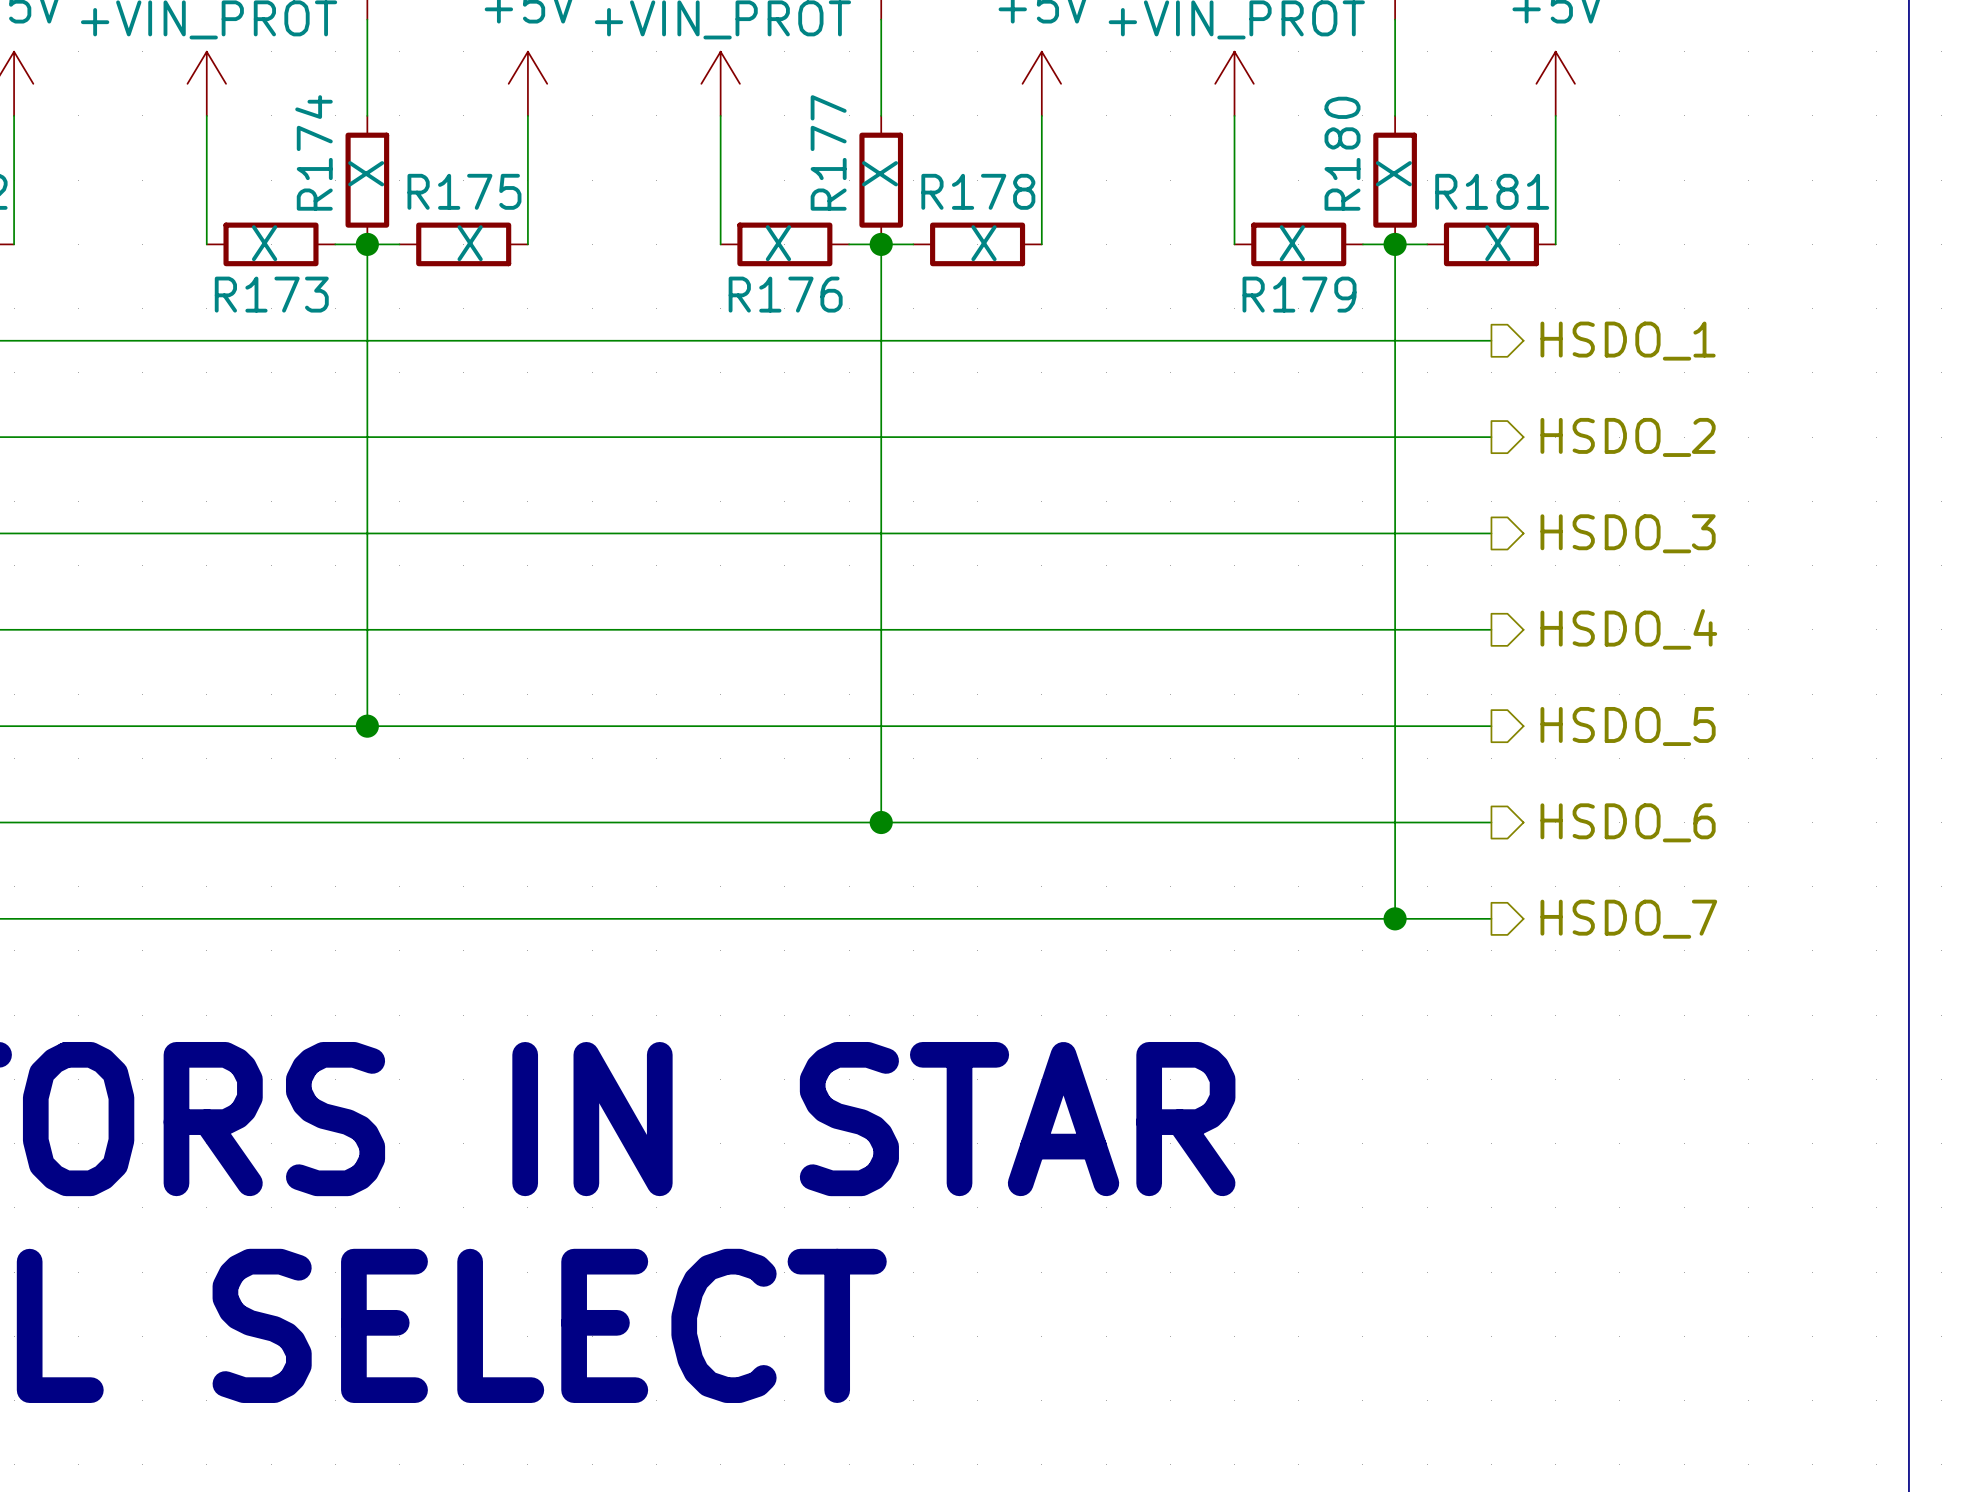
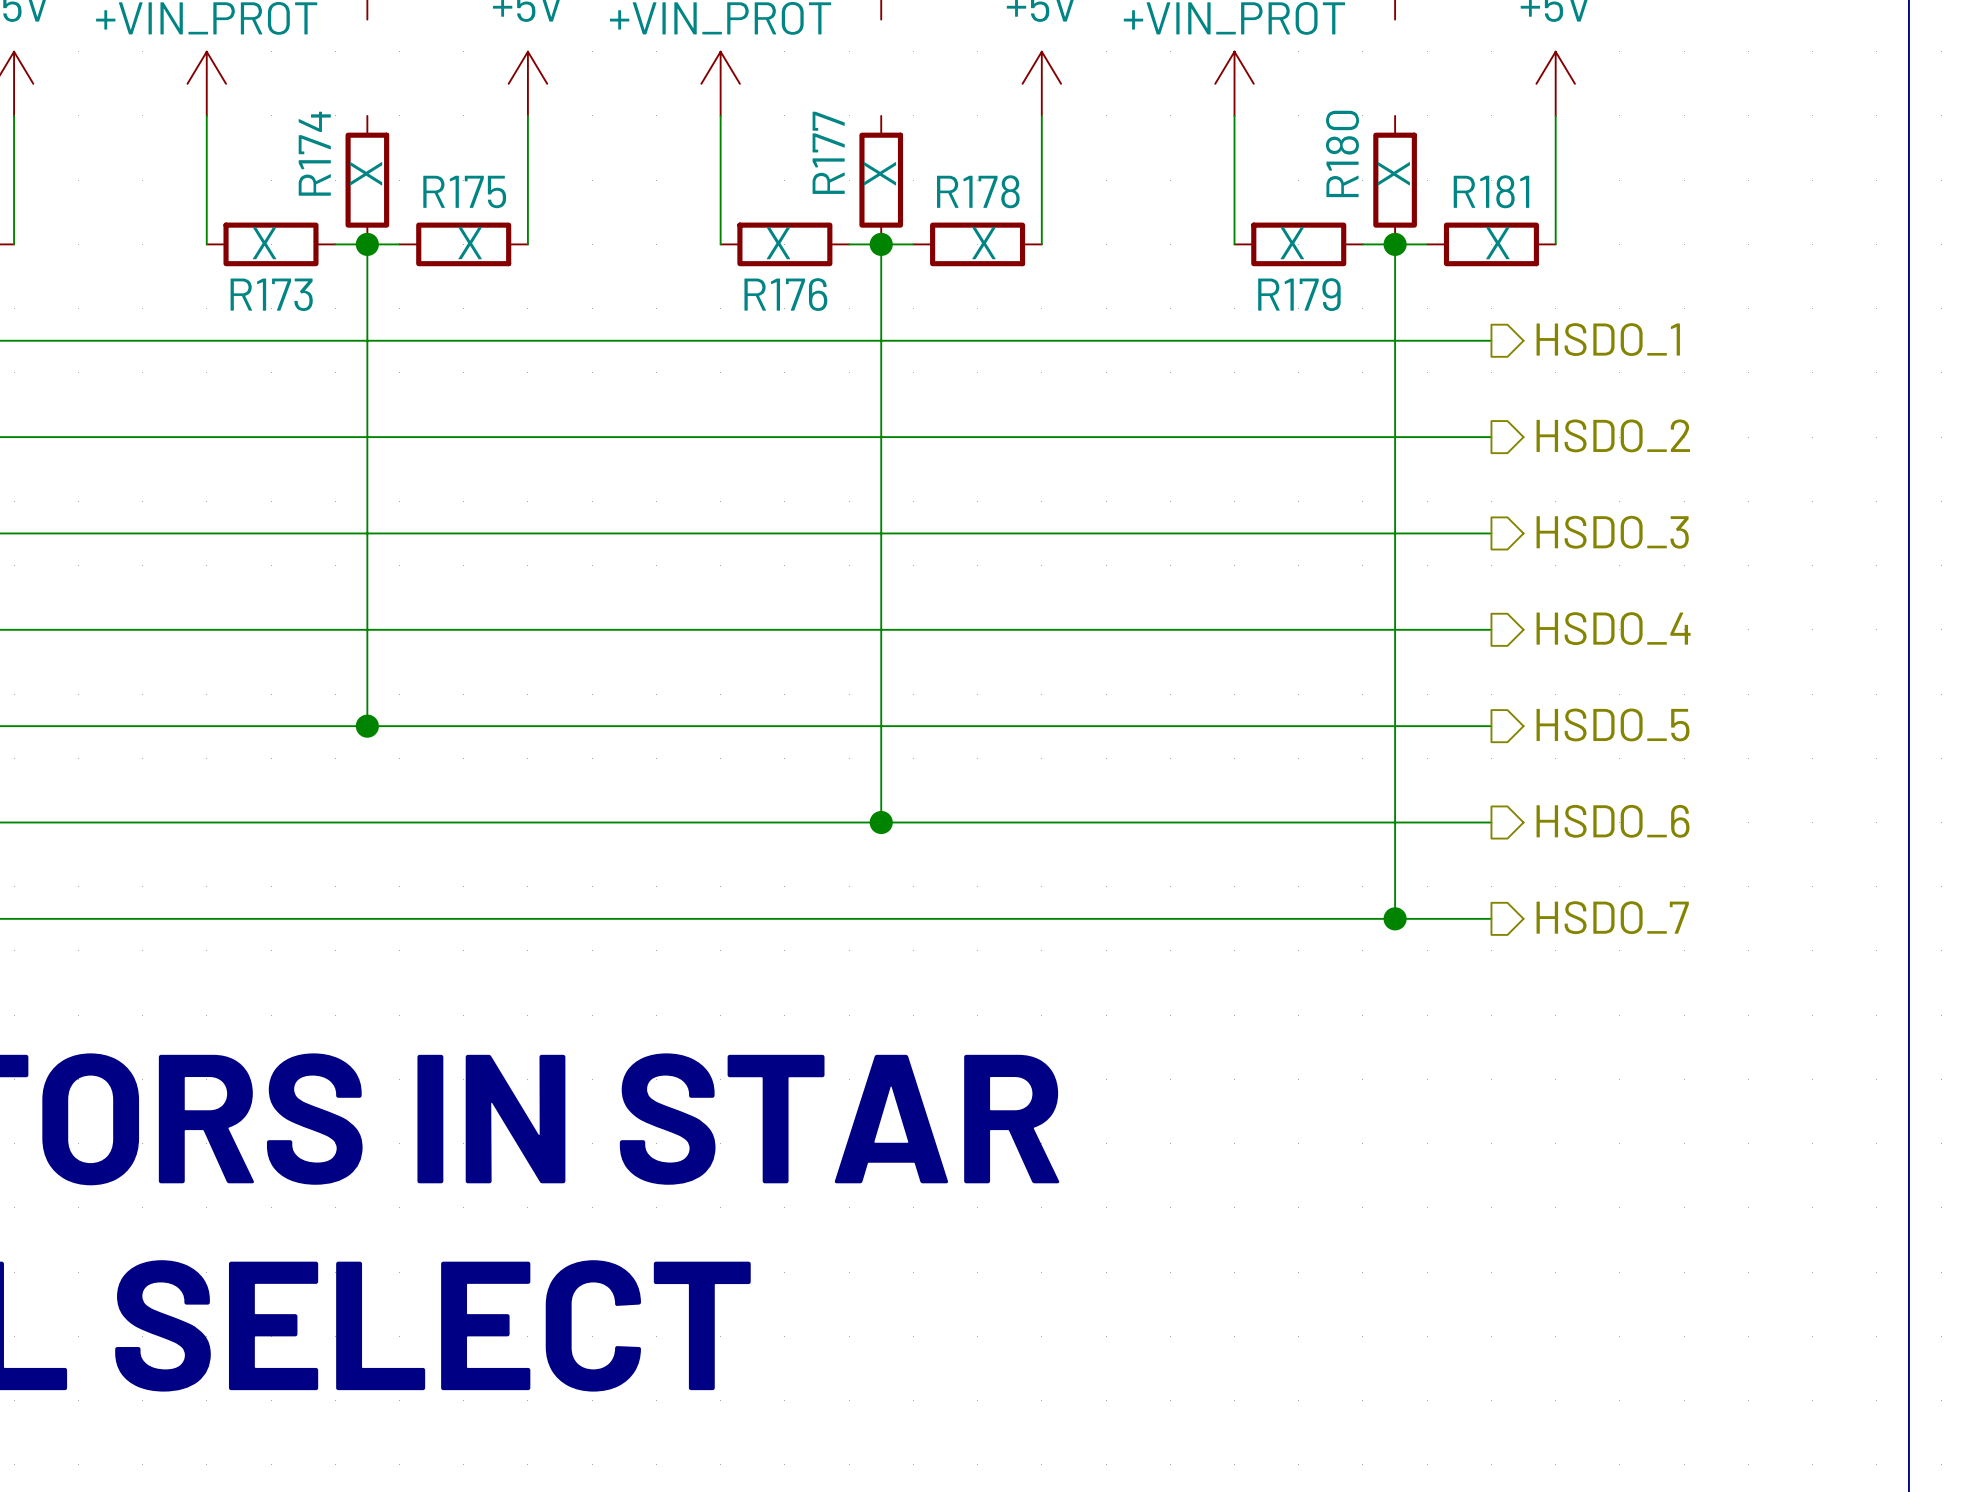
wire: (367, 19) (367, 115) -> none
wire: (881, 19) (881, 115) -> none
wire: (1395, 19) (1395, 115) -> none

